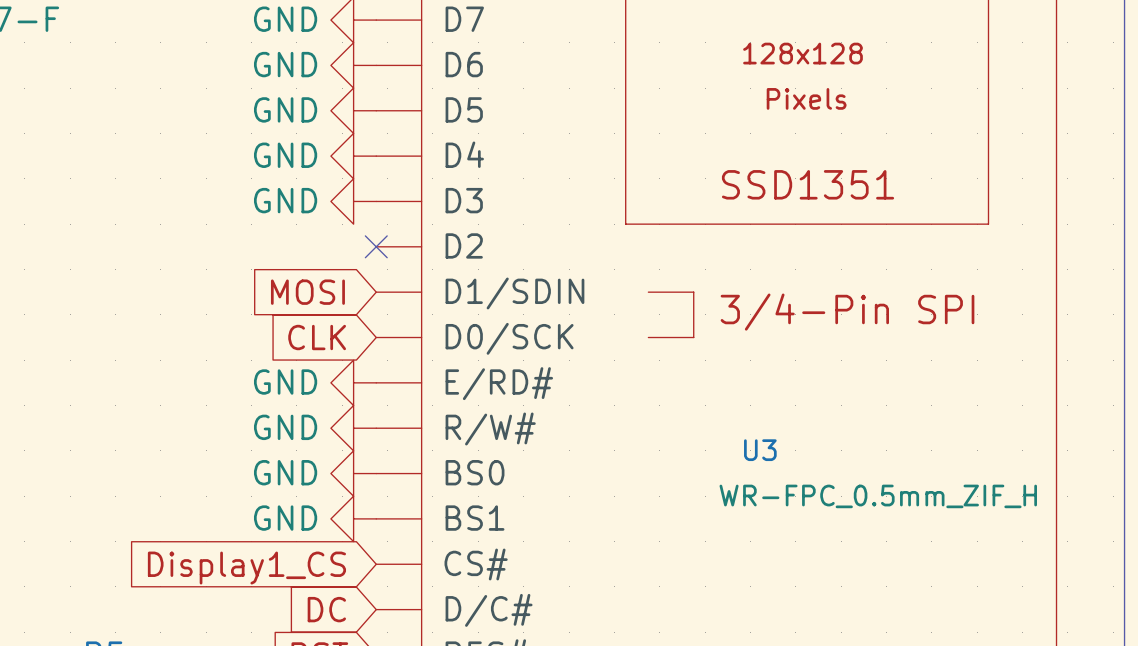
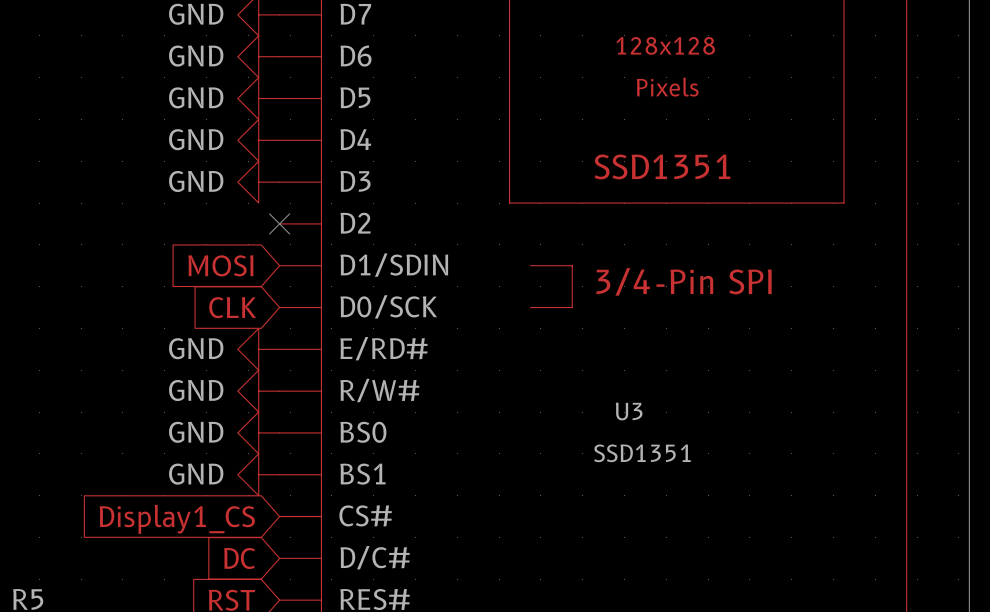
U3 value: WR-FPC_0.5mm_ZIF_H (878, 496) -> SSD1351 (642, 453)

